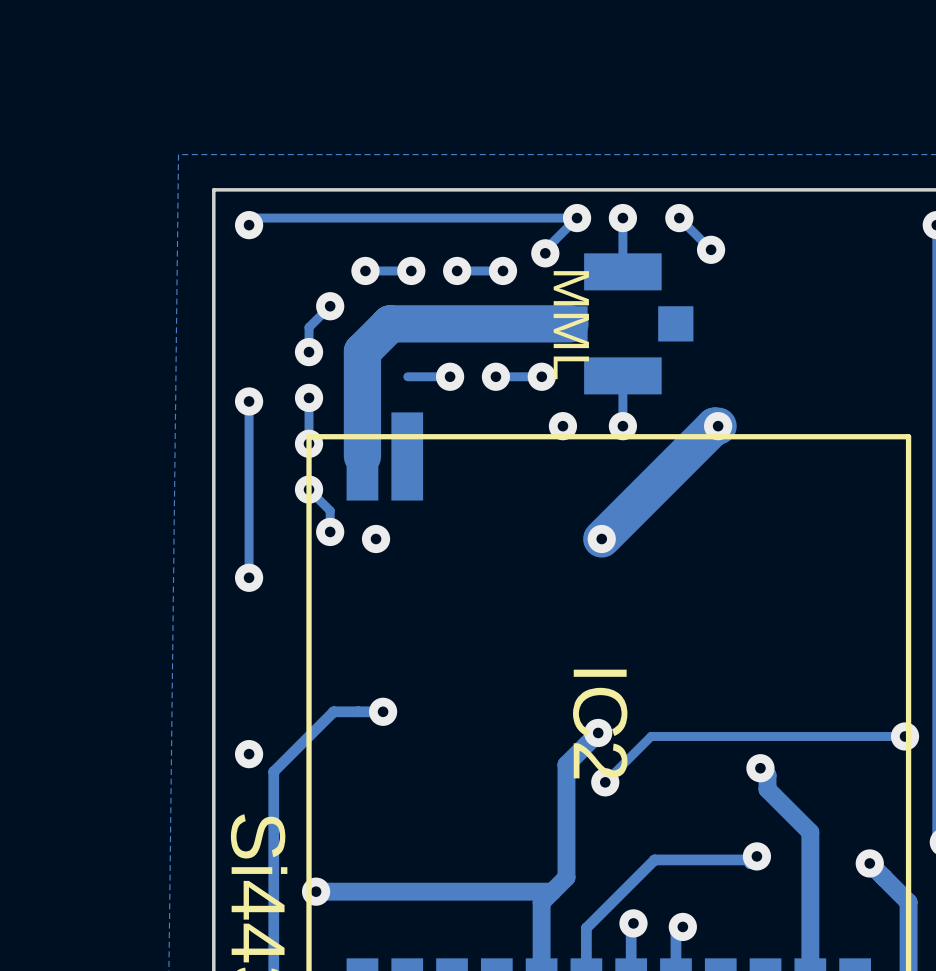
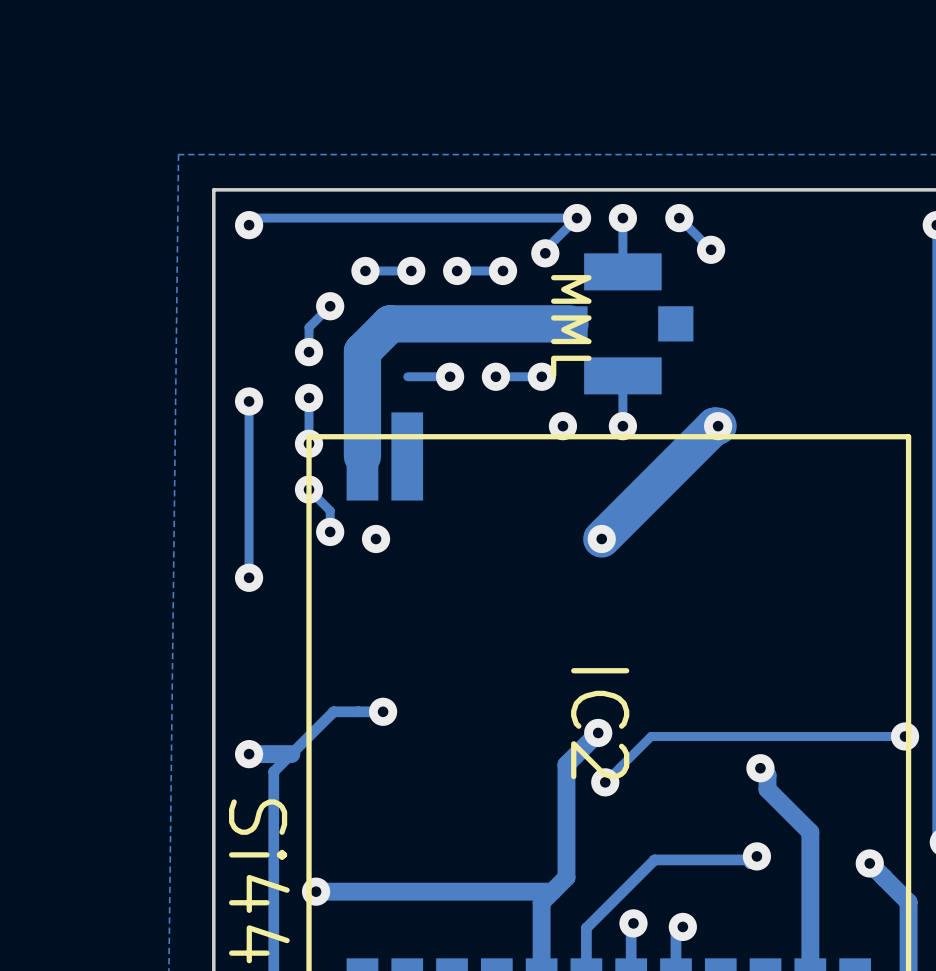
track: none -> (291, 754) (249, 754)

